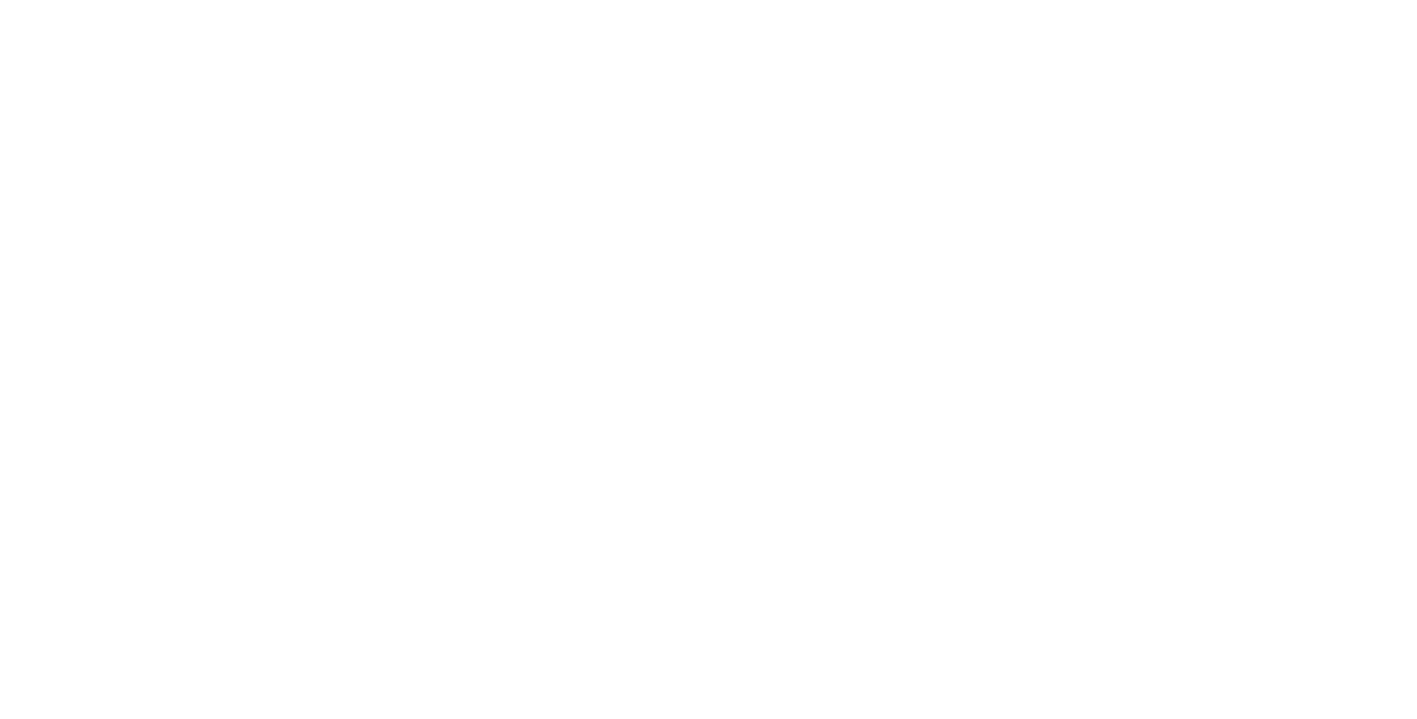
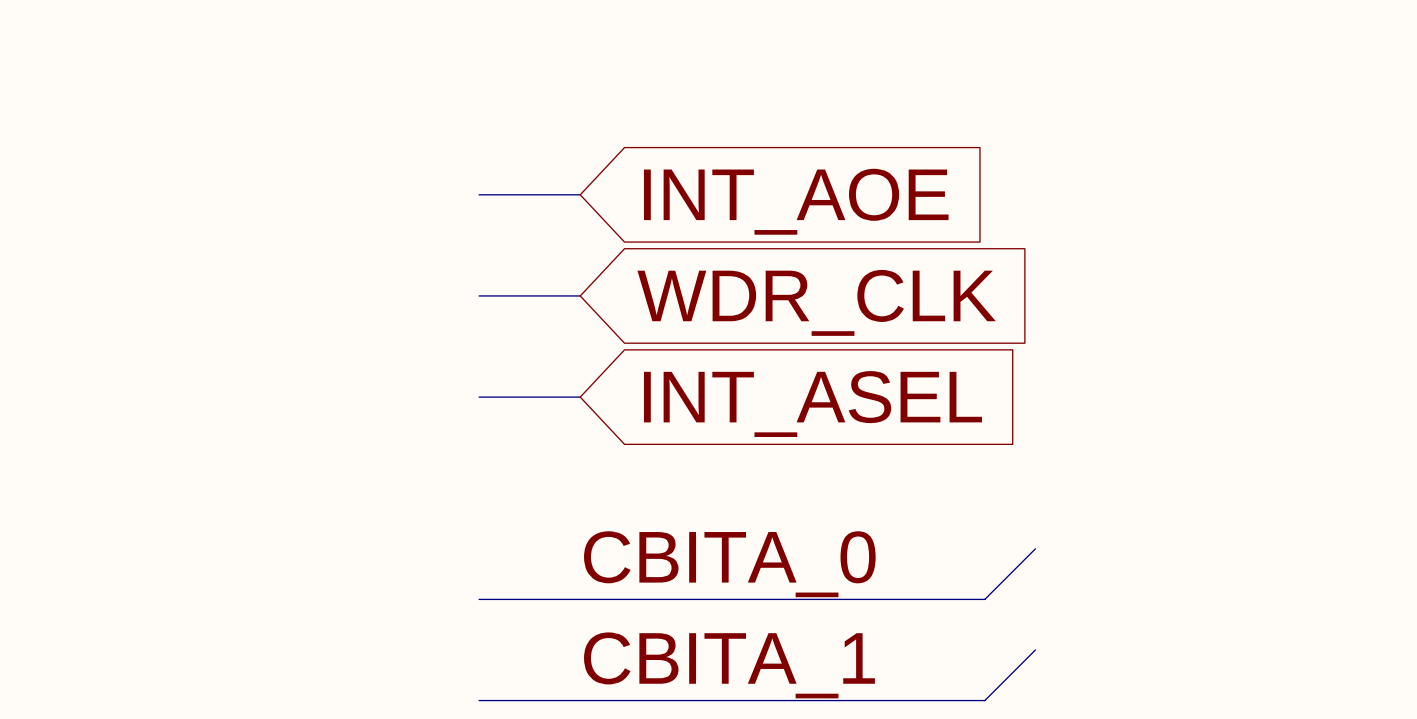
wire: none -> (479, 194) (580, 194)
global label: none -> INT_AOE (796, 201)
wire: none -> (479, 295) (580, 295)
global label: none -> WDR_CLK (816, 302)
wire: none -> (479, 397) (580, 397)
global label: none -> INT_ASEL (812, 404)
wire: none -> (1035, 548) (984, 599) (479, 599)
label: none -> CBITA_0 (729, 564)
wire: none -> (1035, 649) (984, 700) (479, 700)
label: none -> CBITA_1 (729, 665)

